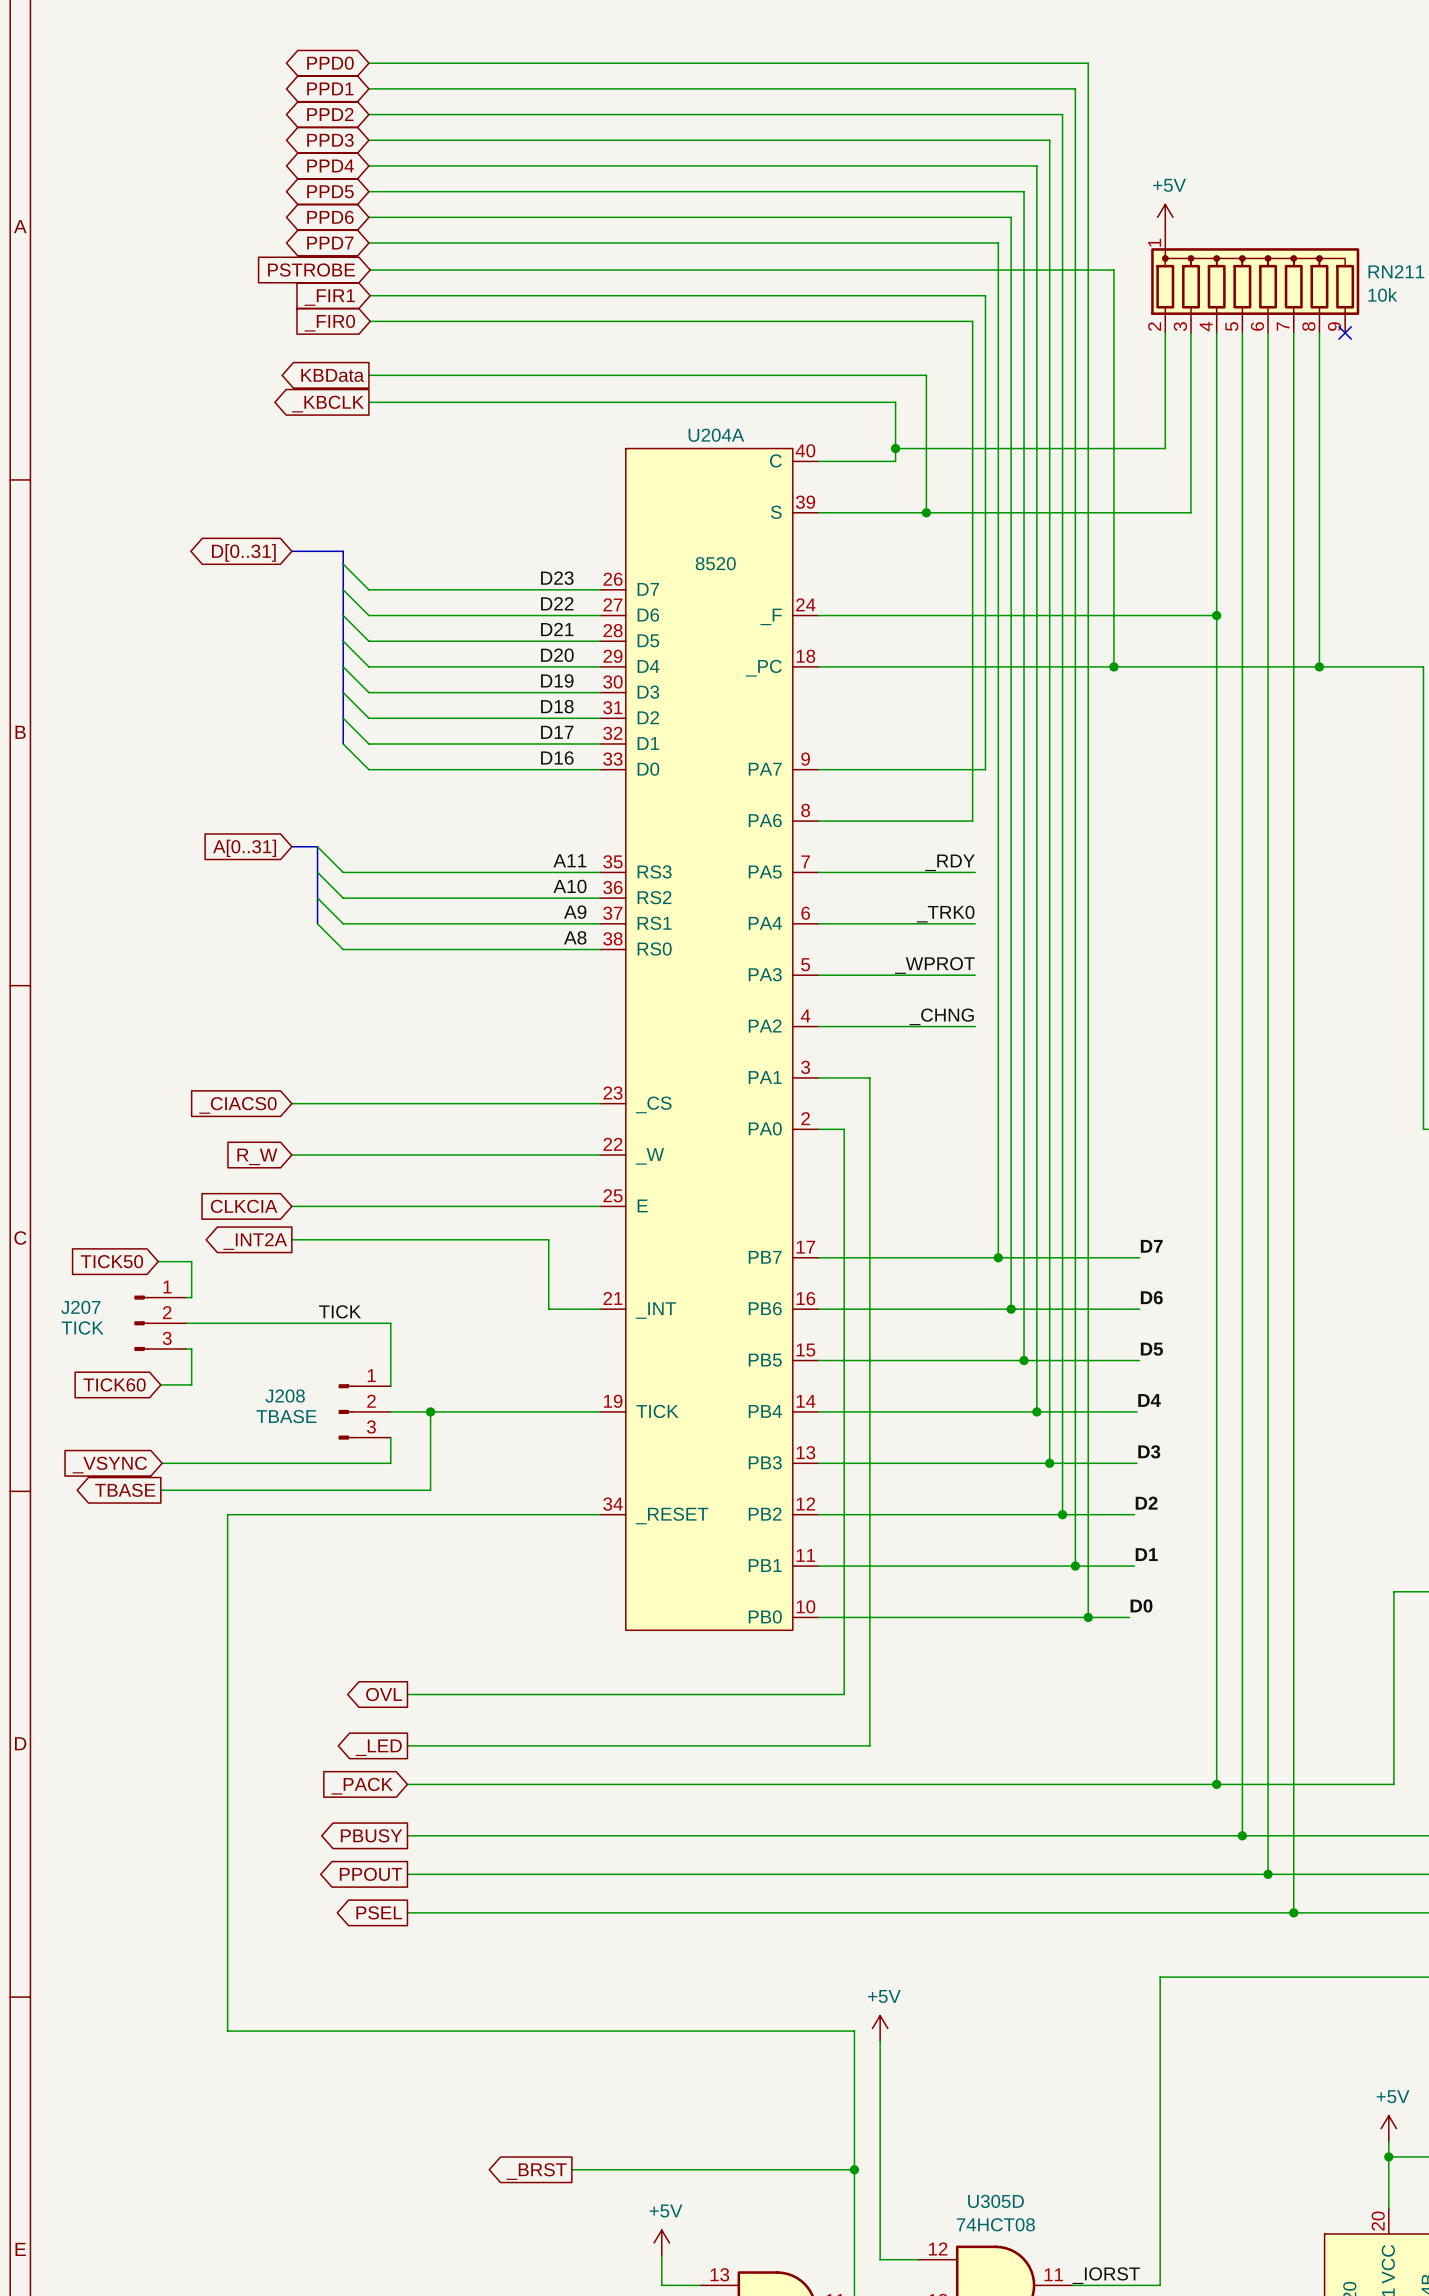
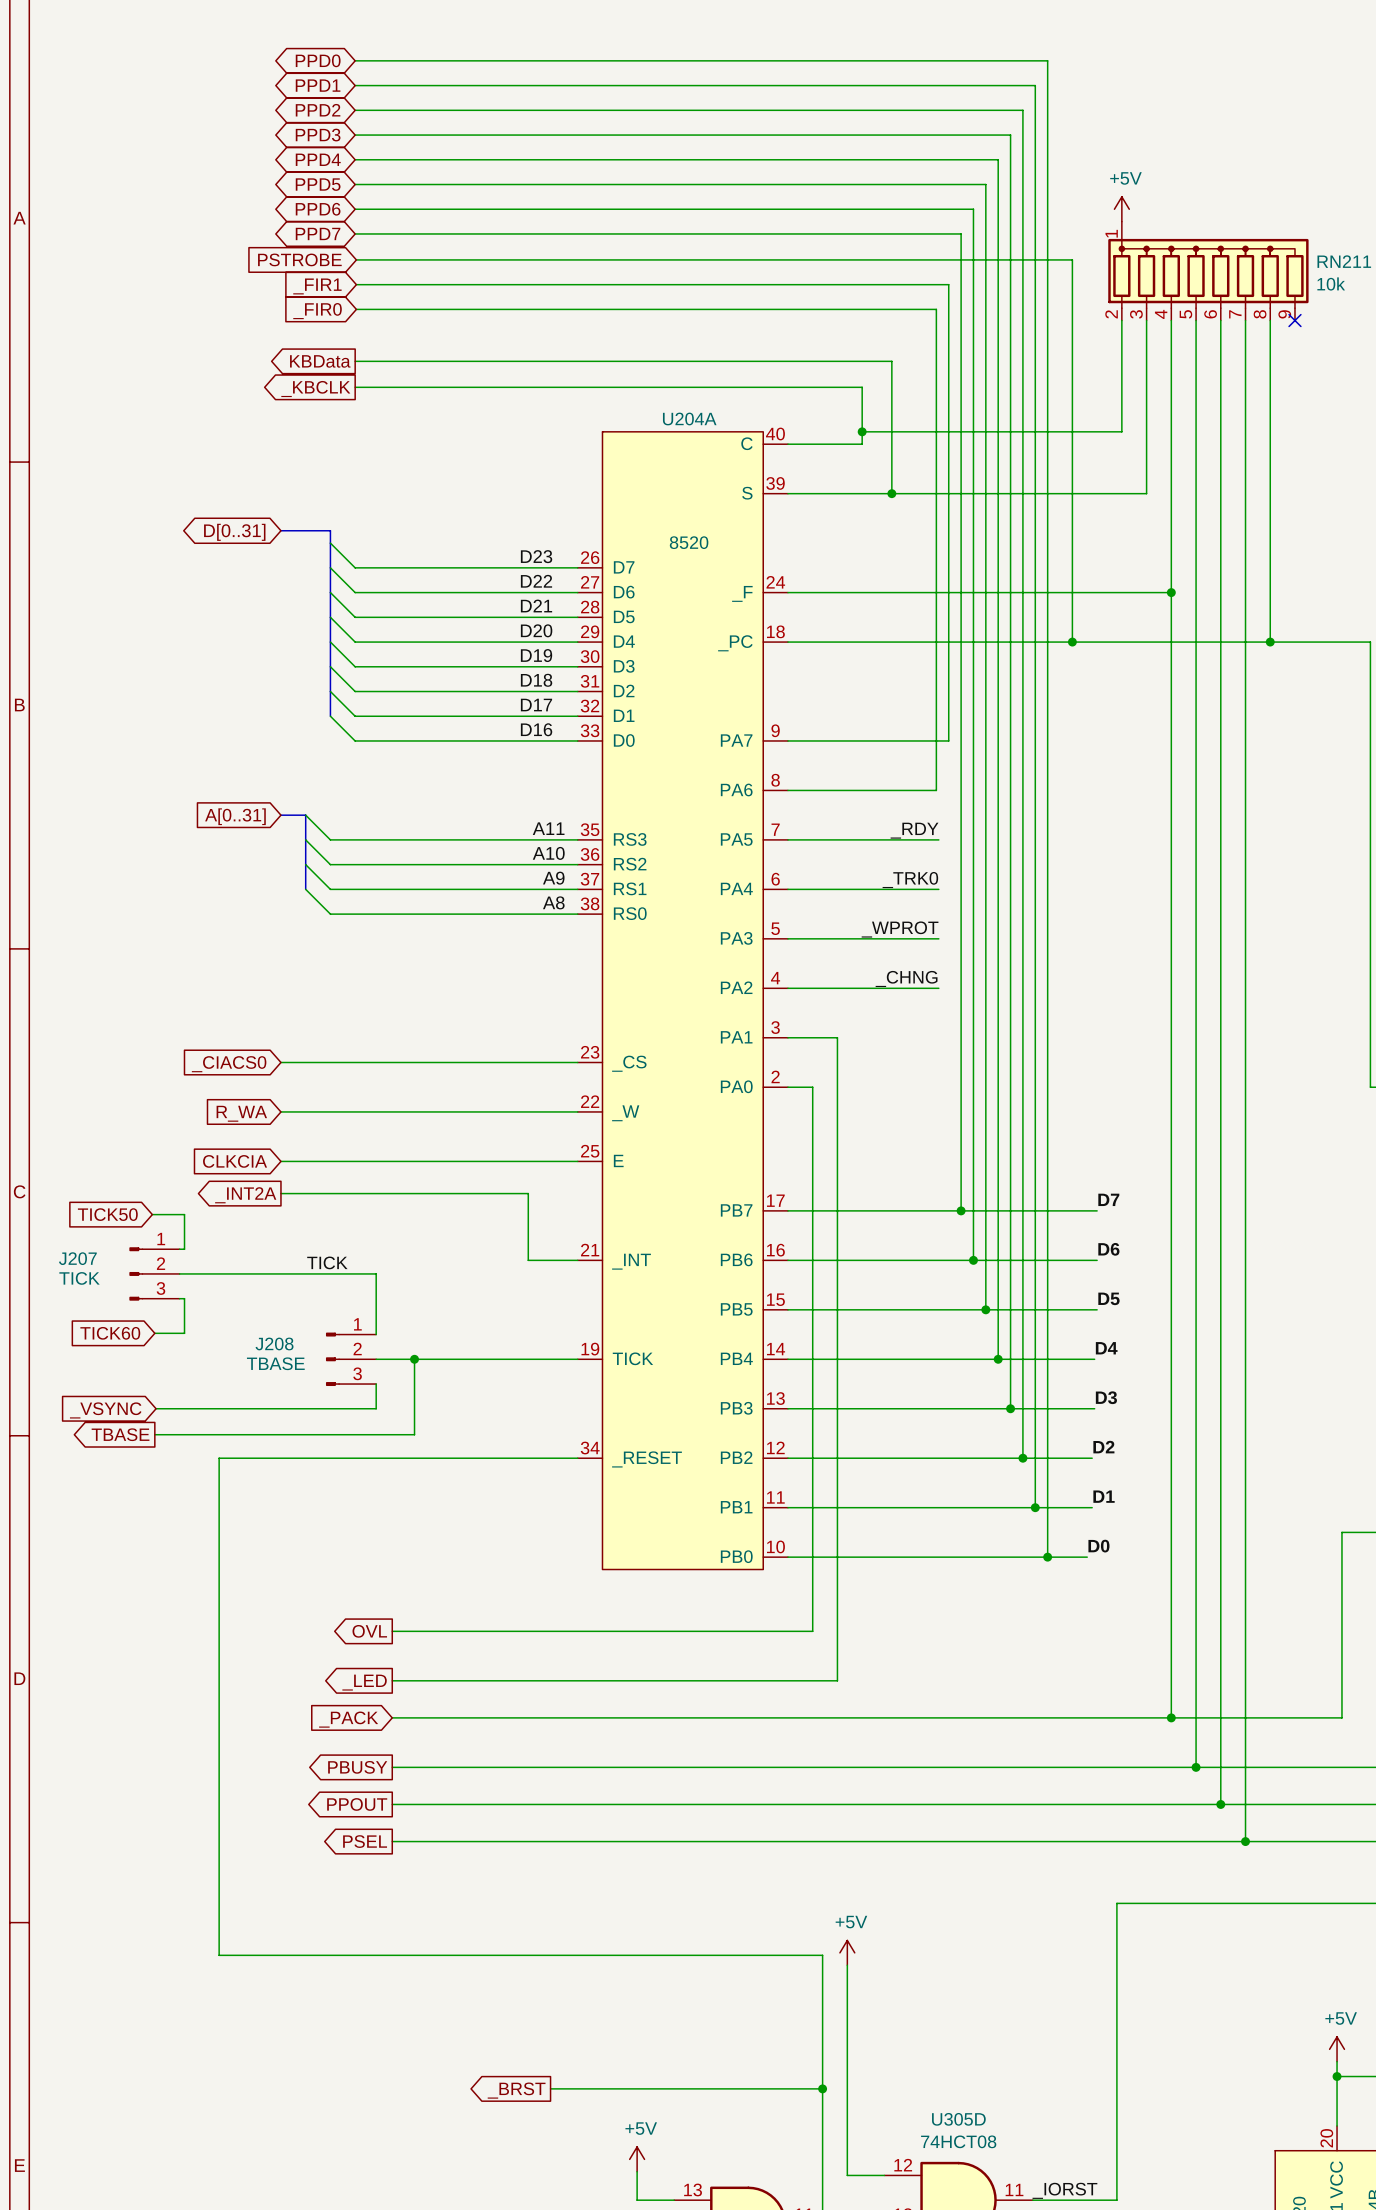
global label: R_W (257, 1156) -> R_WA (241, 1113)

